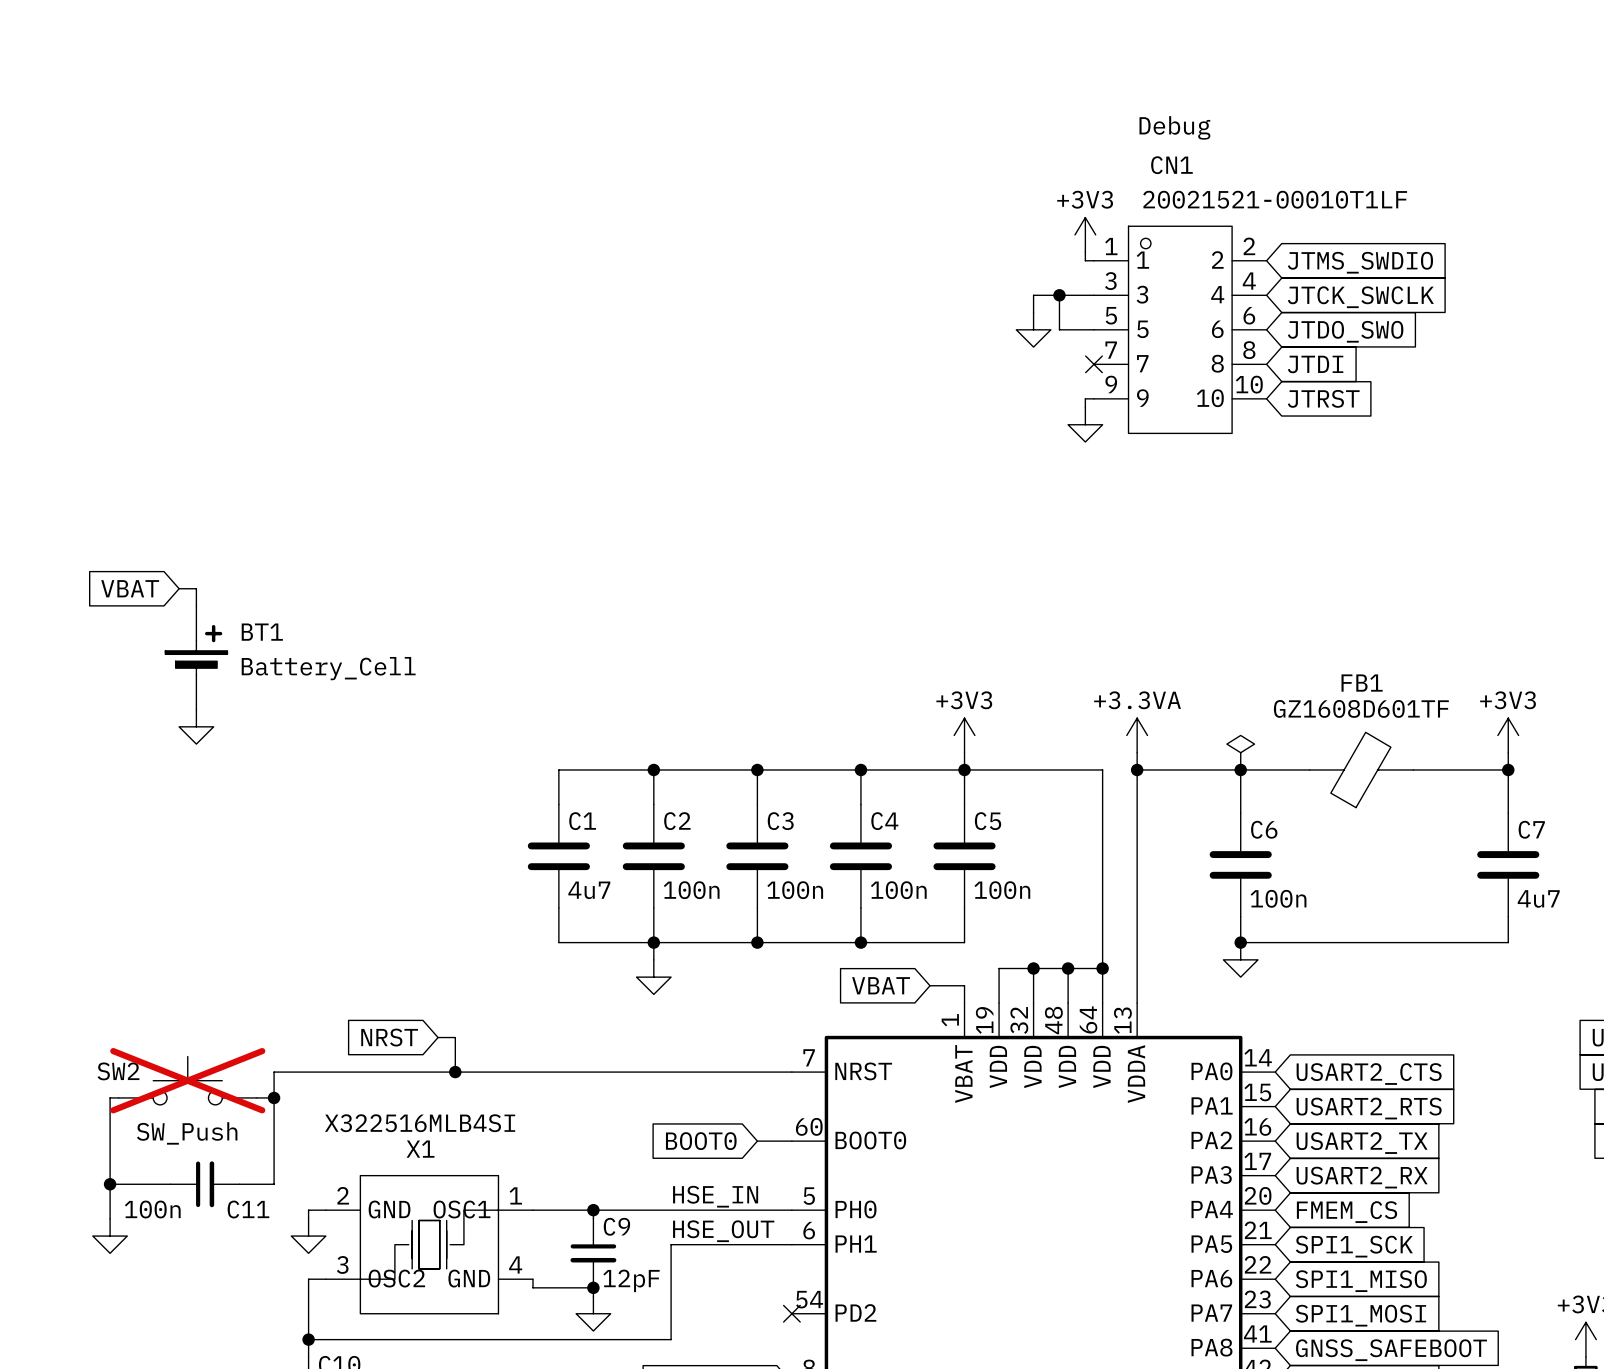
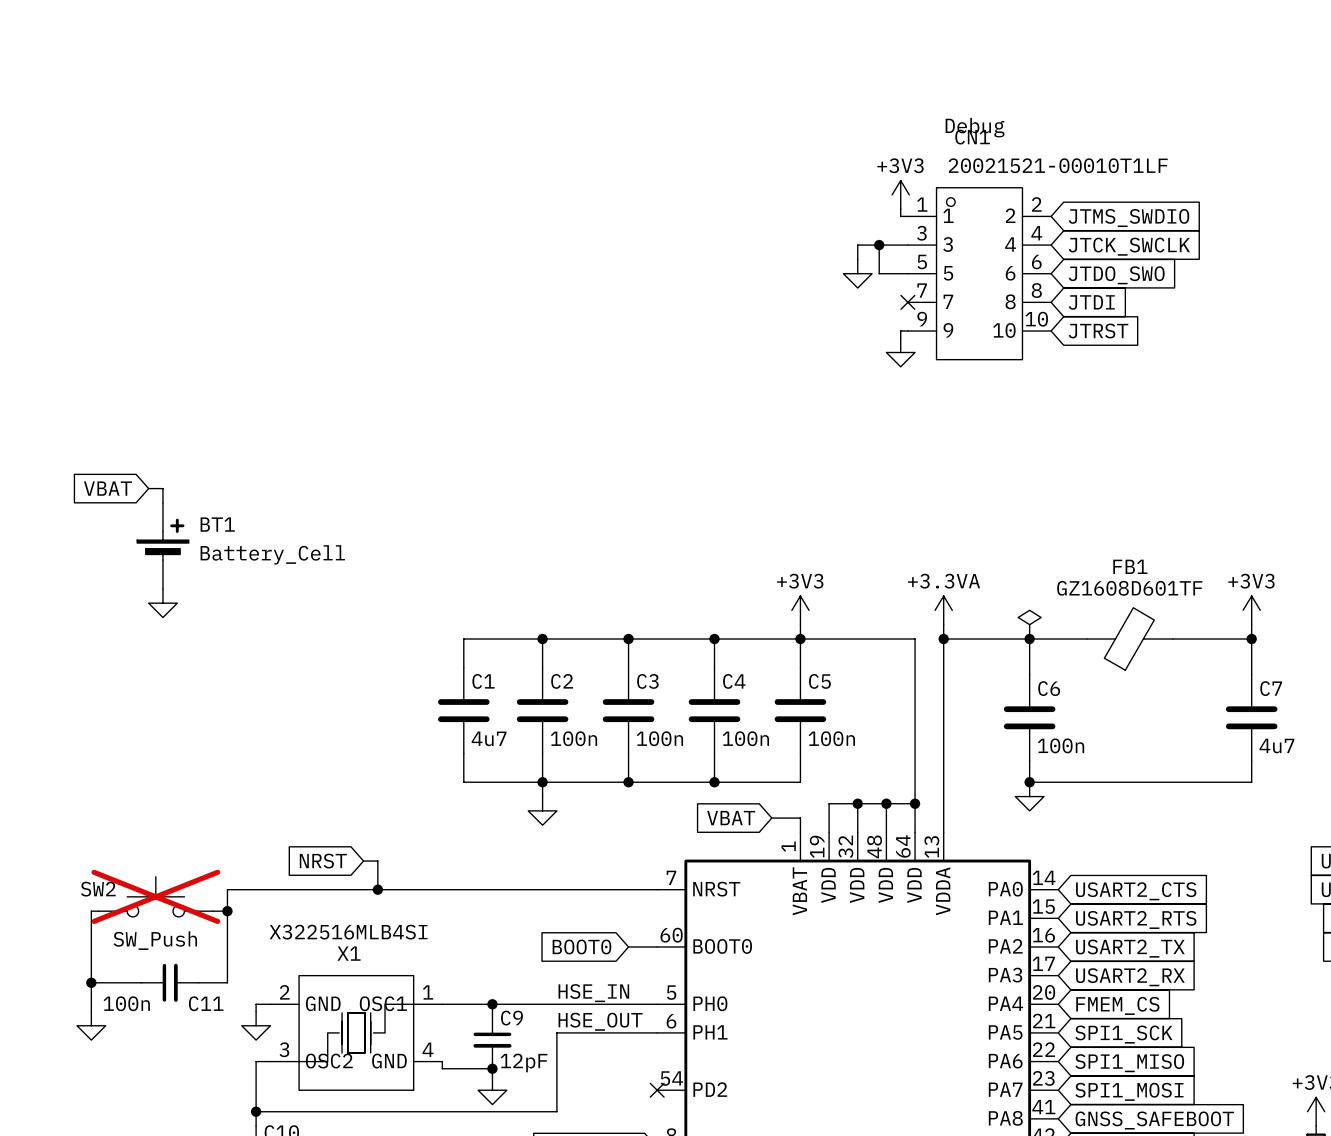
text position: Debug (1174, 127) -> Debug (975, 127)

